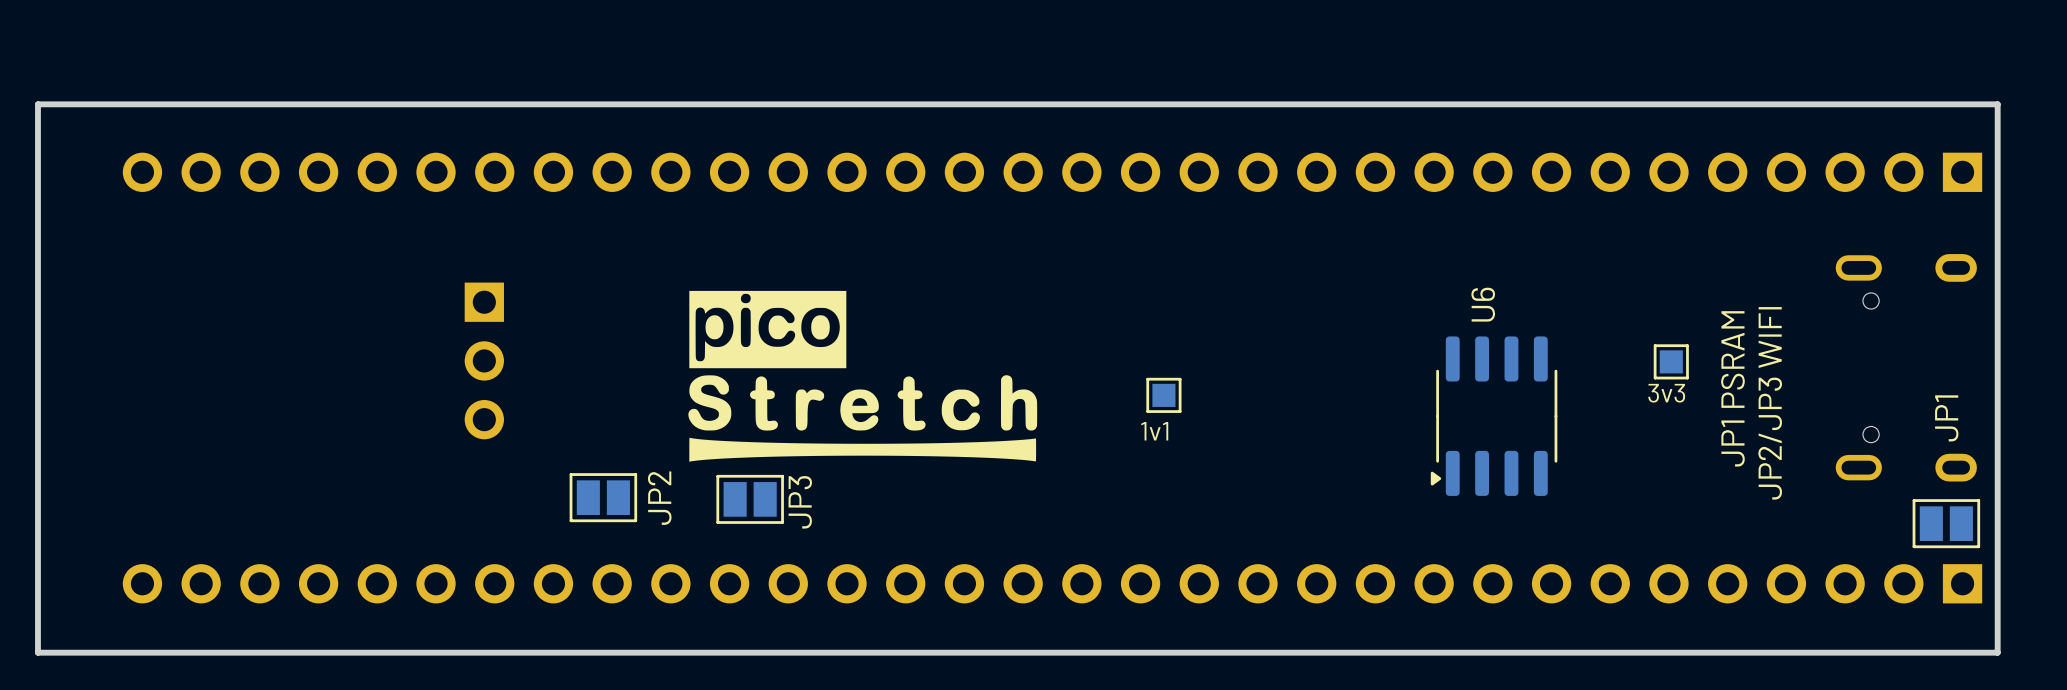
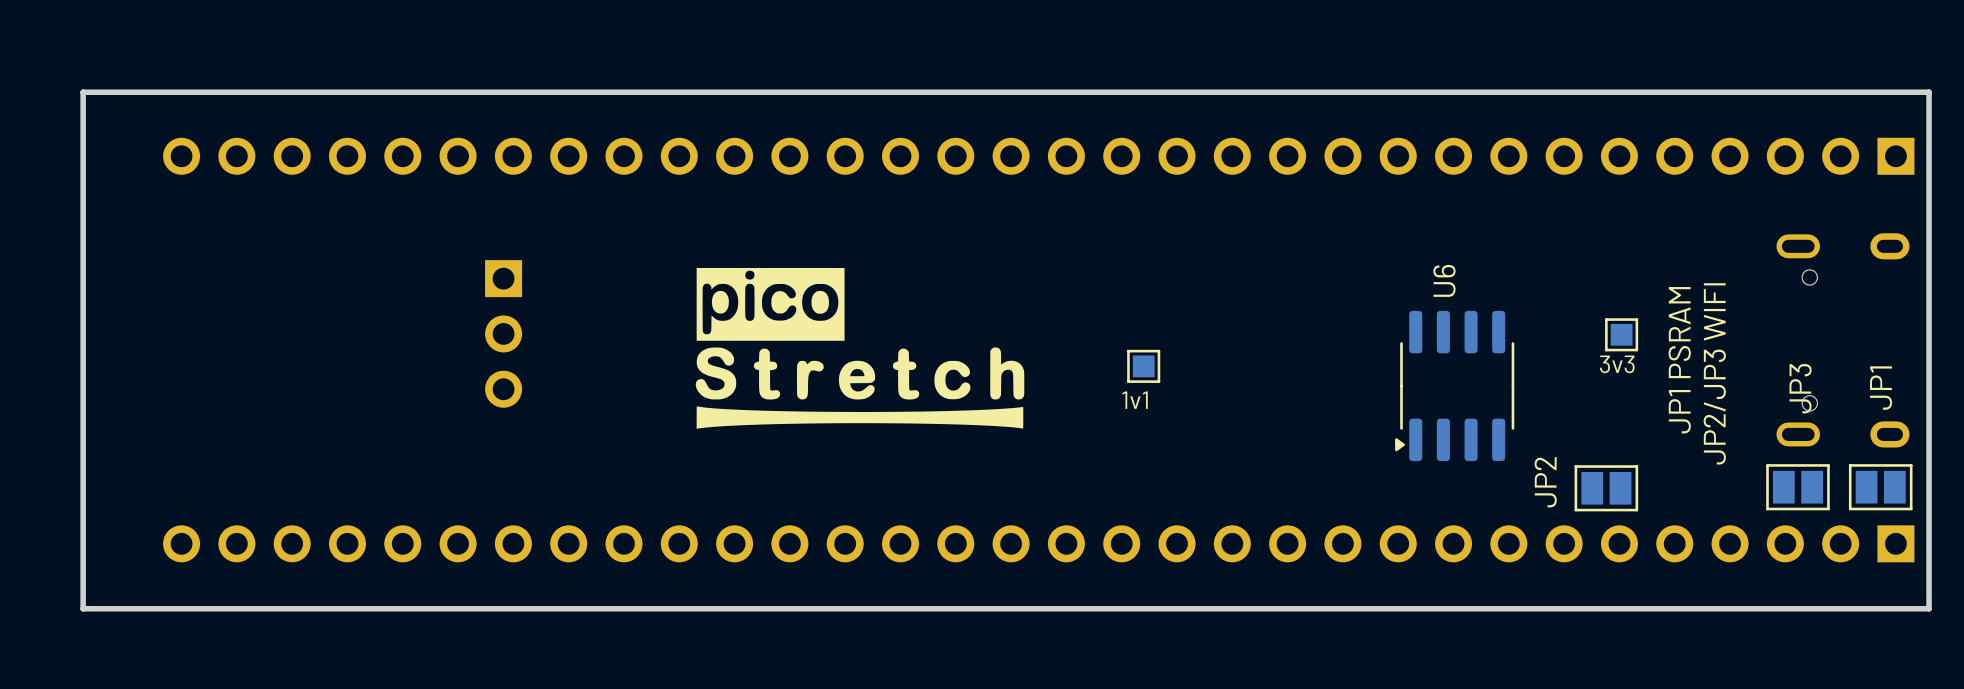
JP2 position: (603, 497) -> (1606, 488)
JP2 name position: JP2 (659, 498) -> JP2 (1545, 482)
JP3 position: (750, 499) -> (1797, 487)
JP3 name position: JP3 (800, 502) -> JP3 (1800, 388)

